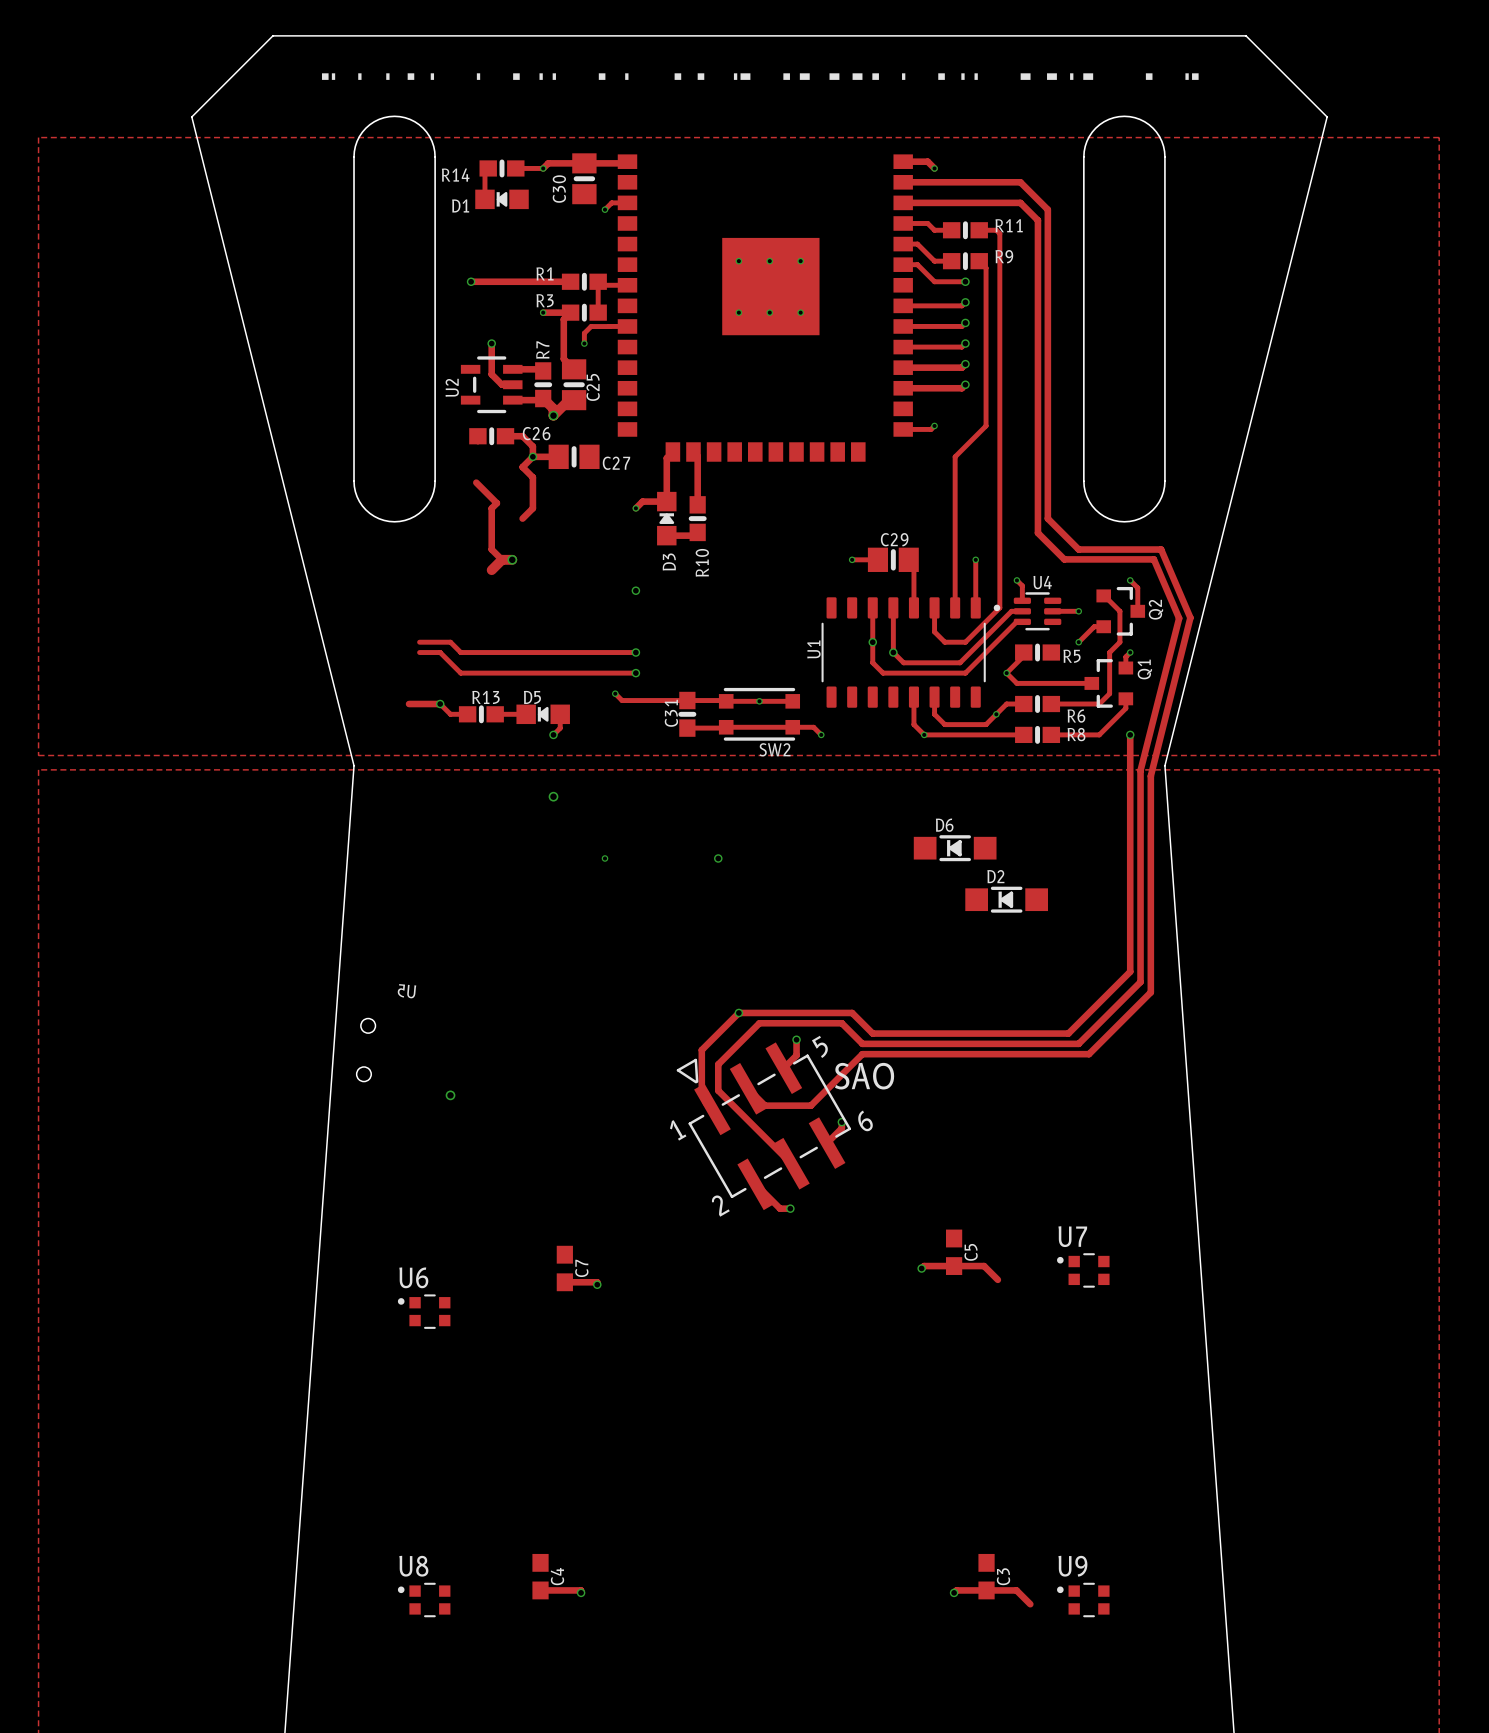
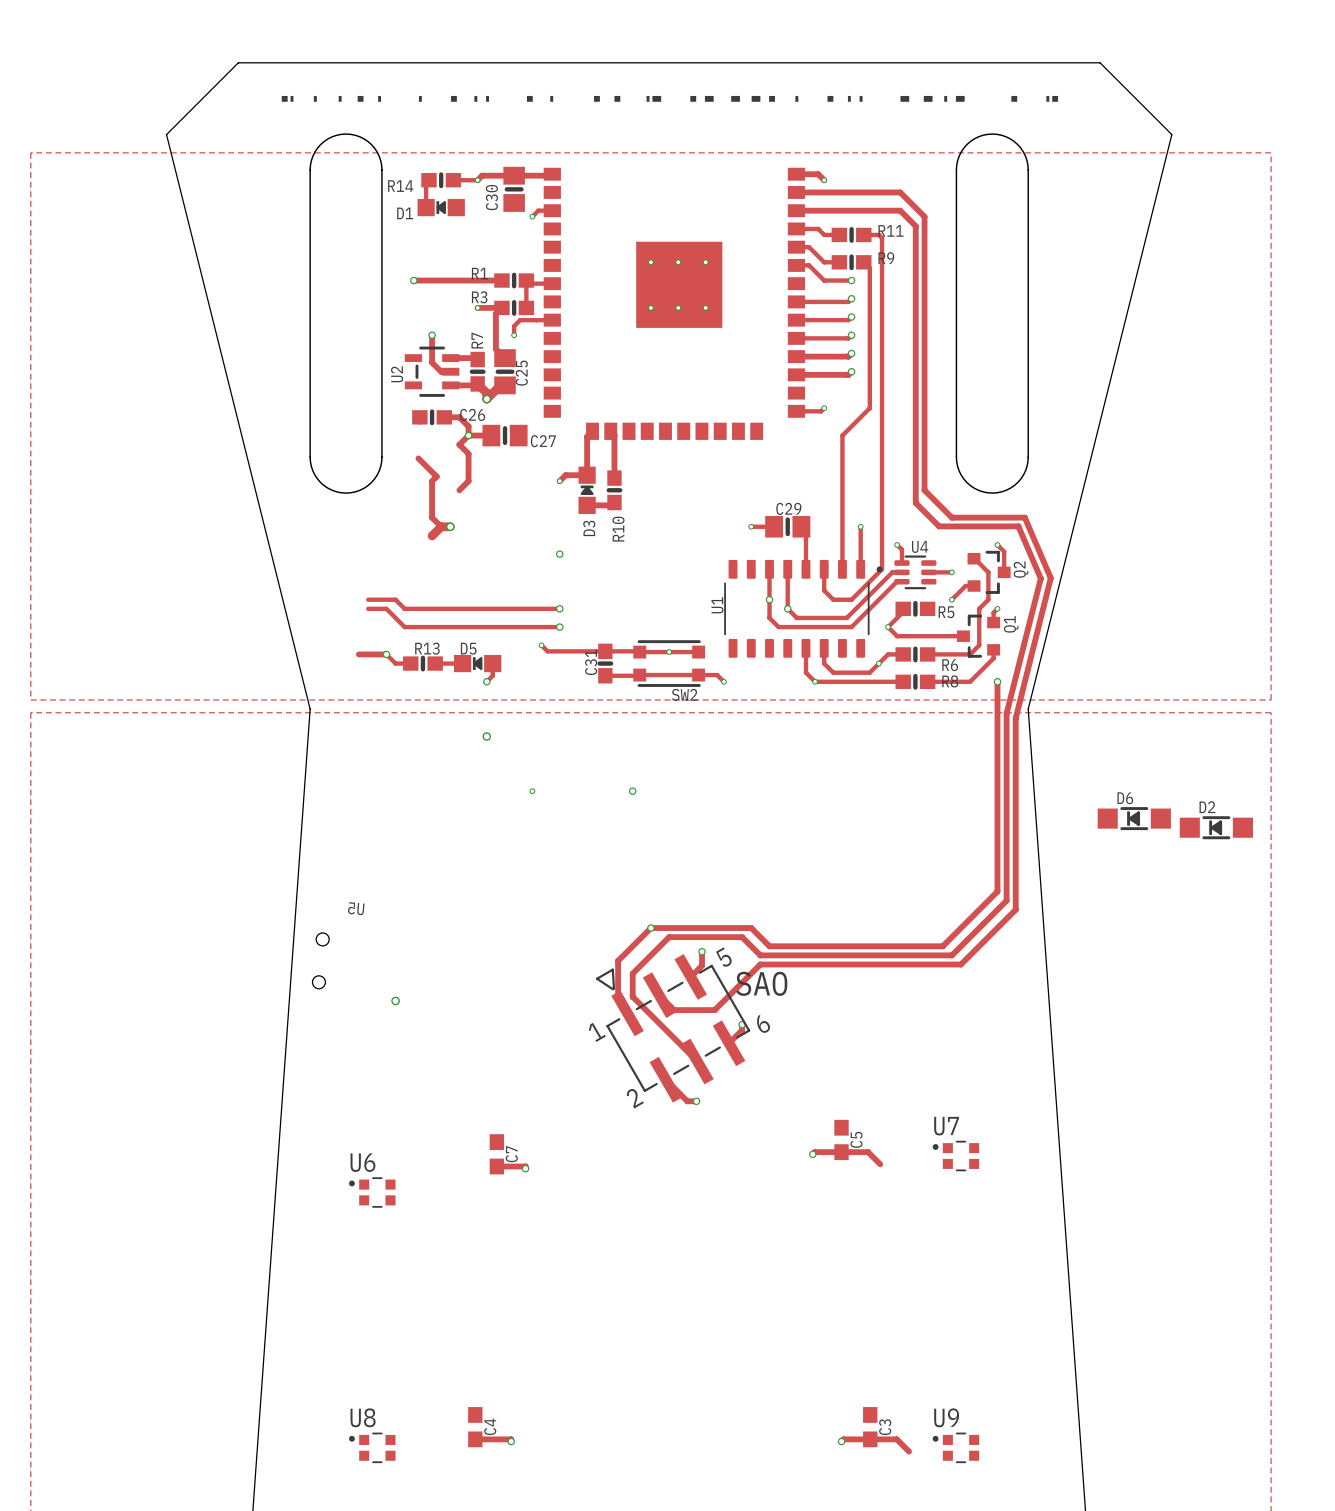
D6 position: (955, 848) -> (1134, 818)
D2 position: (1006, 899) -> (1216, 827)

